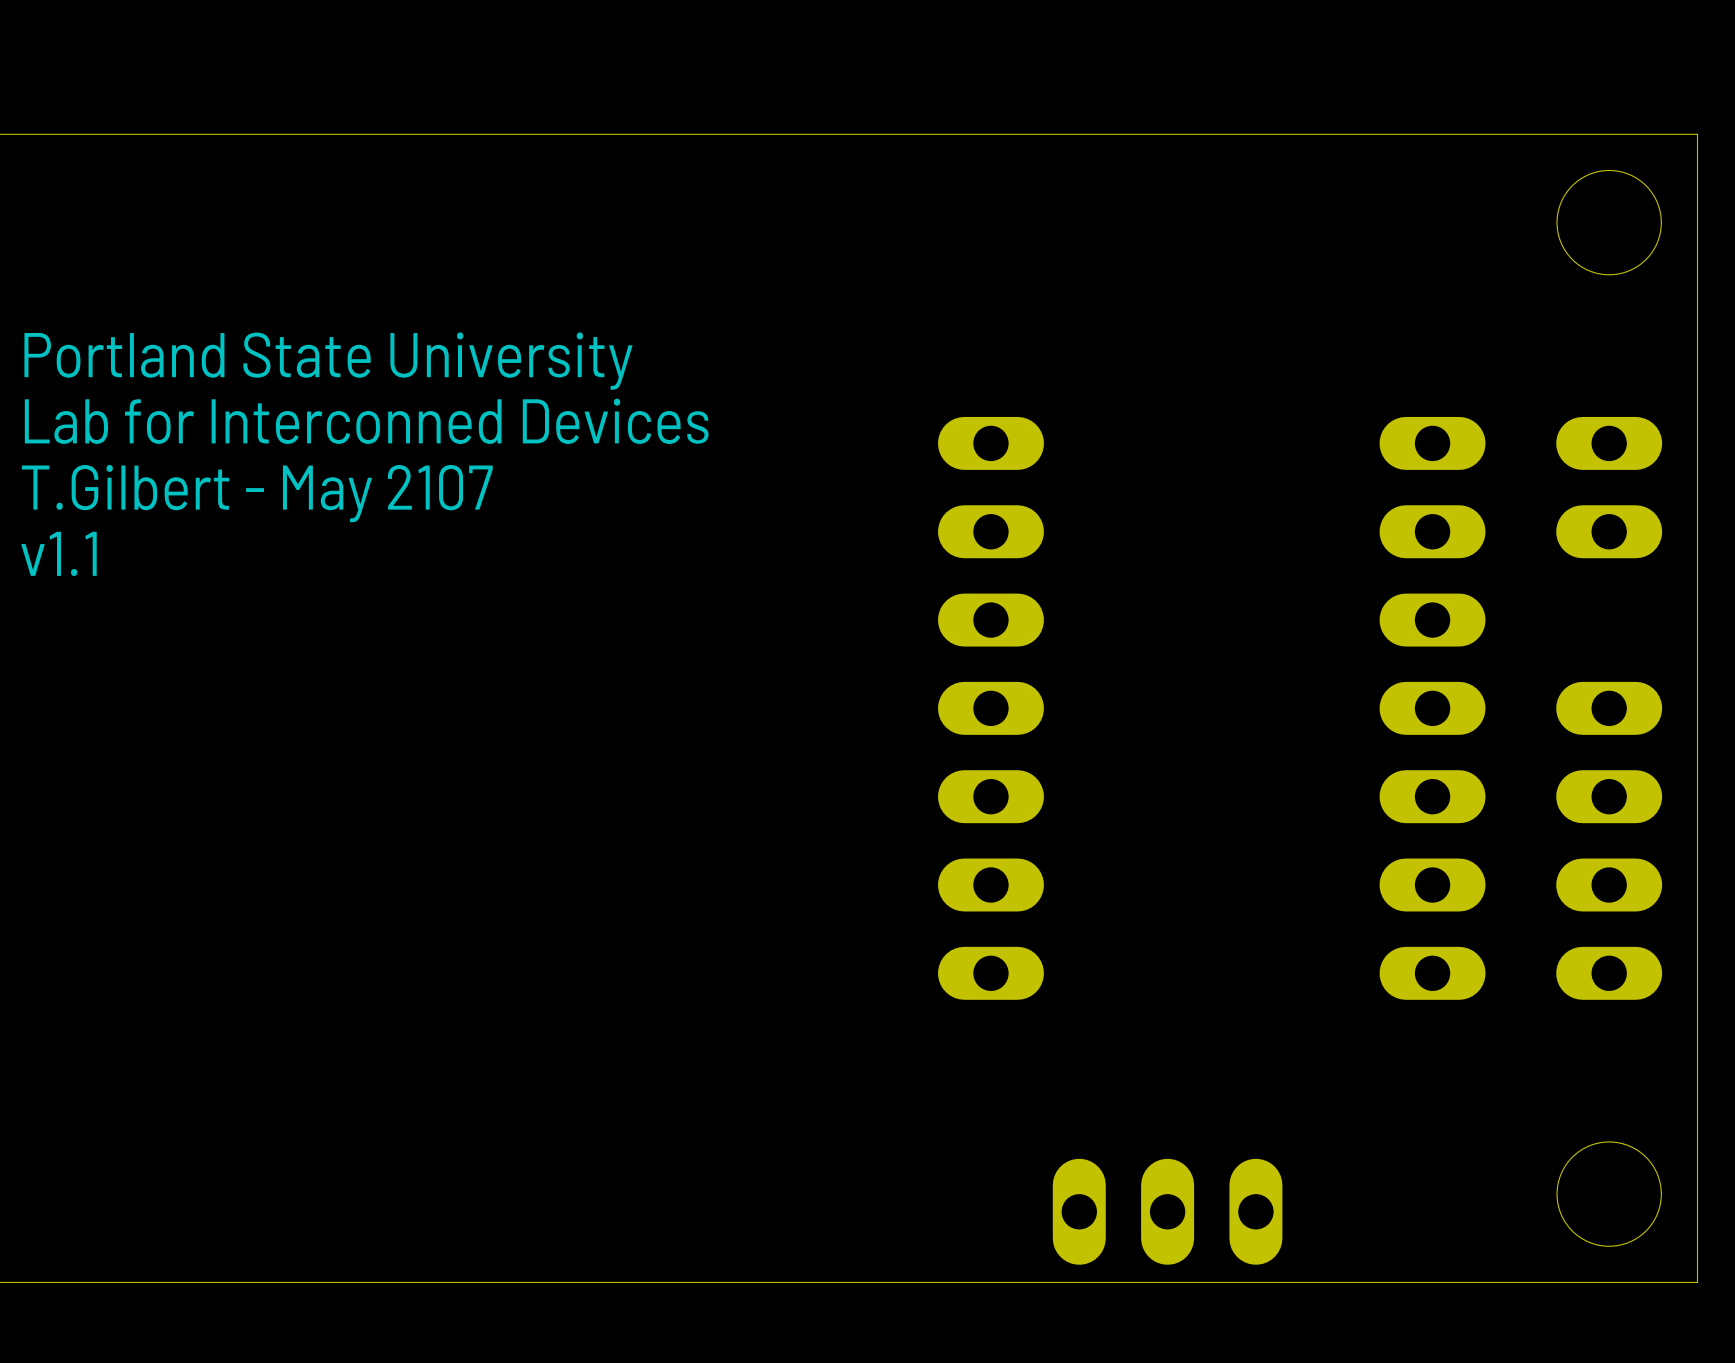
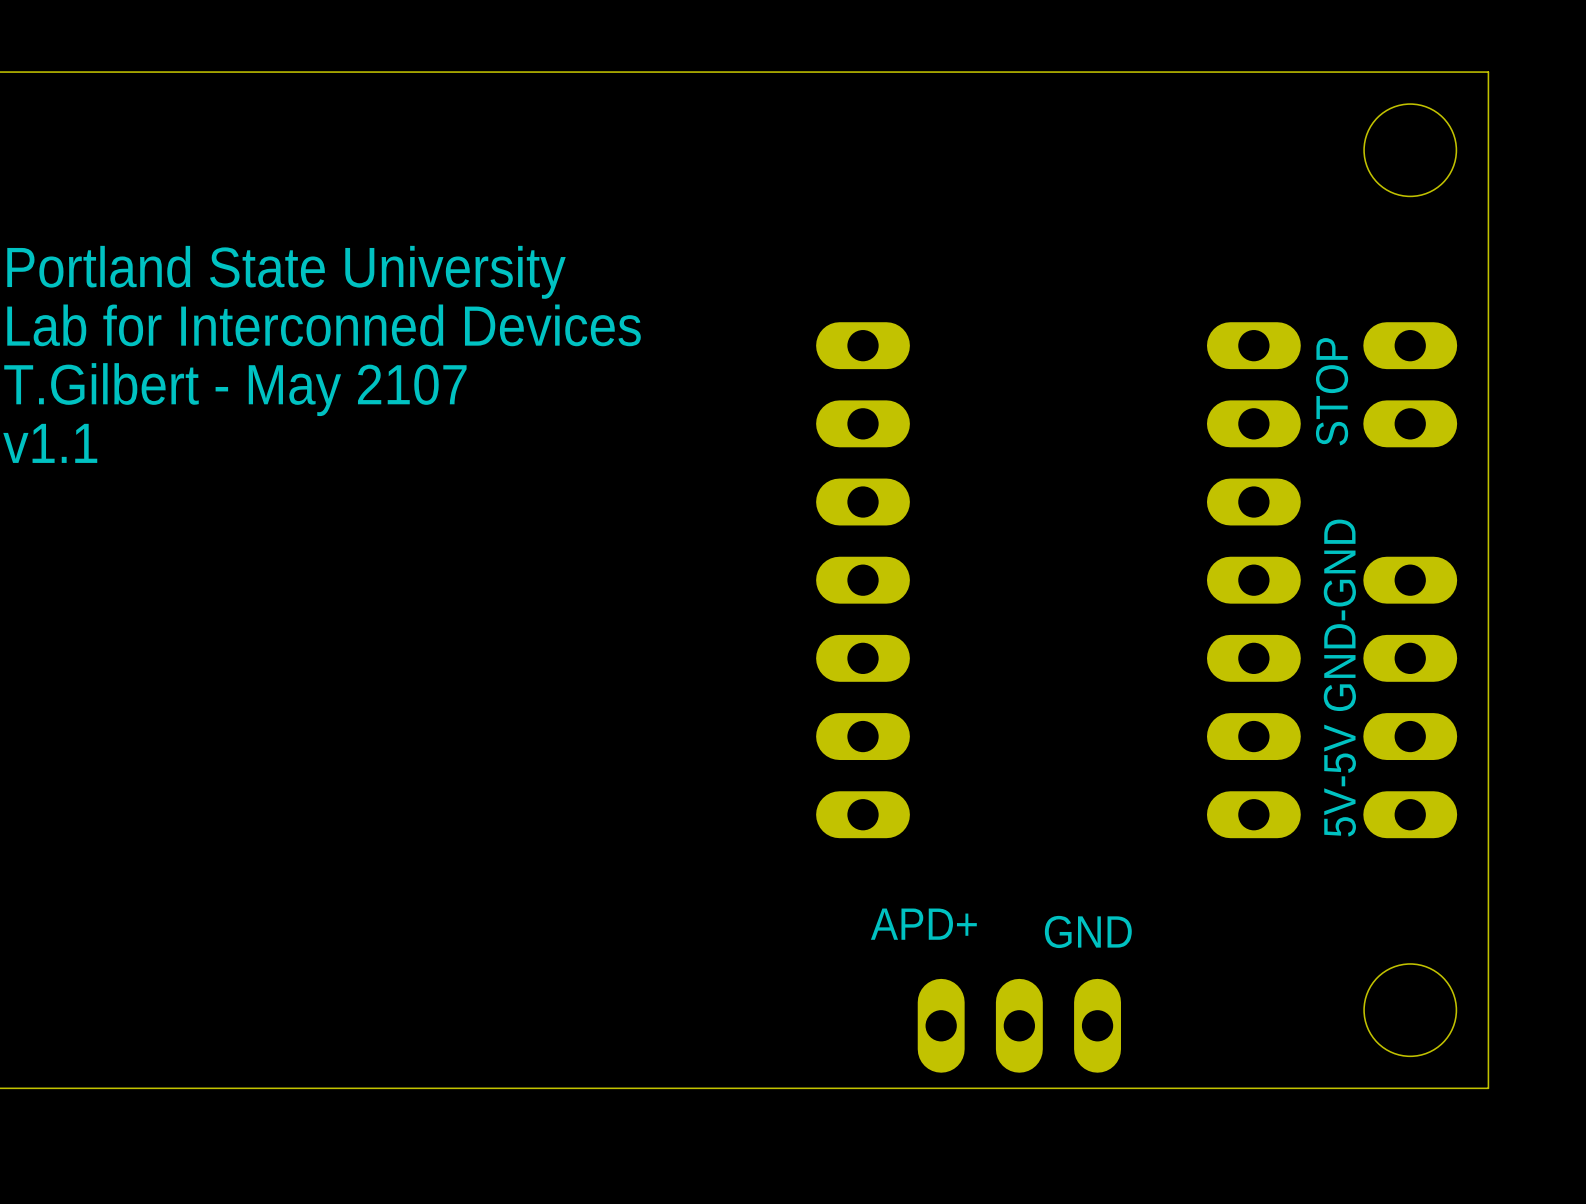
text: none -> STOP (1332, 391)
text: none -> GND-GND (1339, 615)
text: none -> 5V-5V (1340, 780)
text: none -> APD+ (923, 924)
text: none -> GND (1088, 931)

